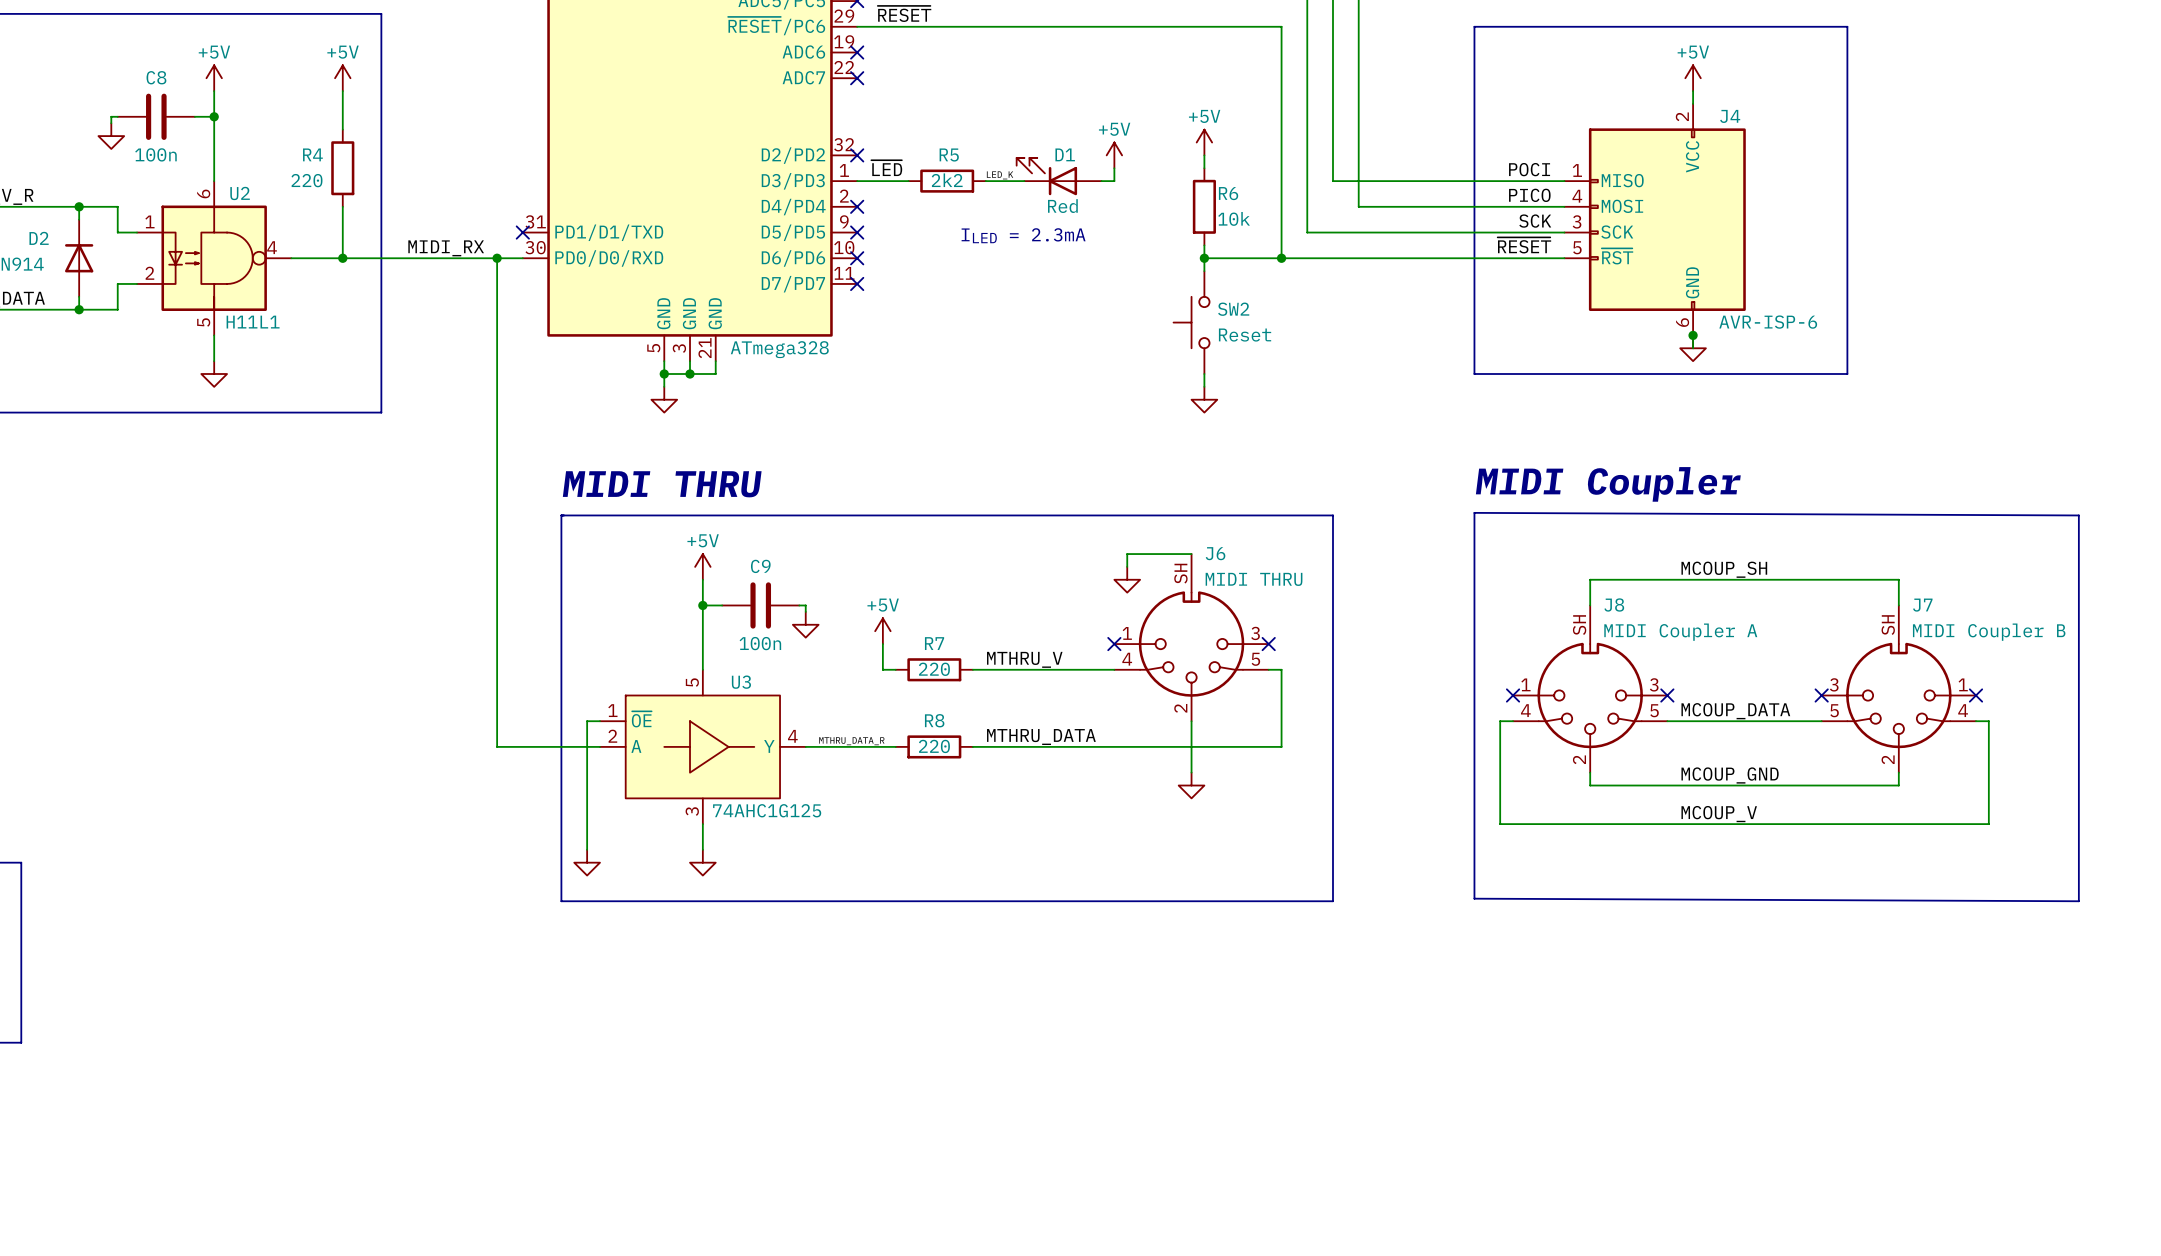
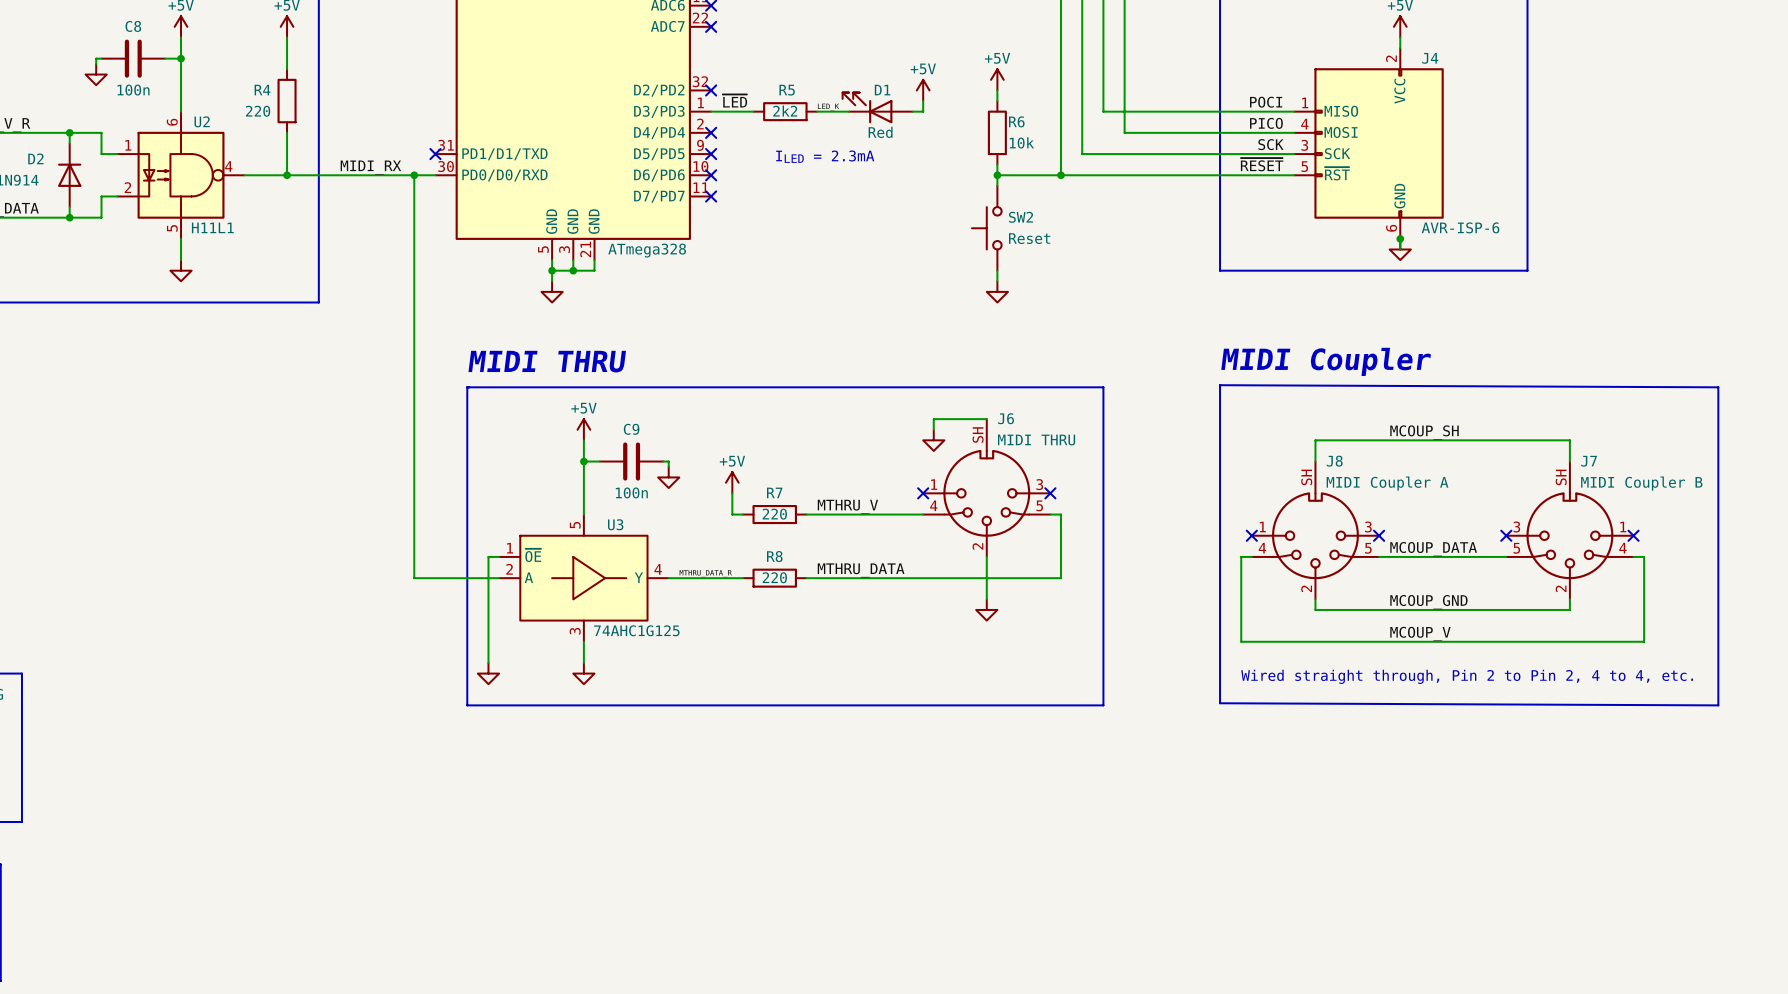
text position: ILED = 2.3mA (1023, 235) -> ILED = 2.3mA (825, 156)
text: none -> Wired straight through, Pin 2 to Pin 2, 4 to 4, etc. (1467, 676)

